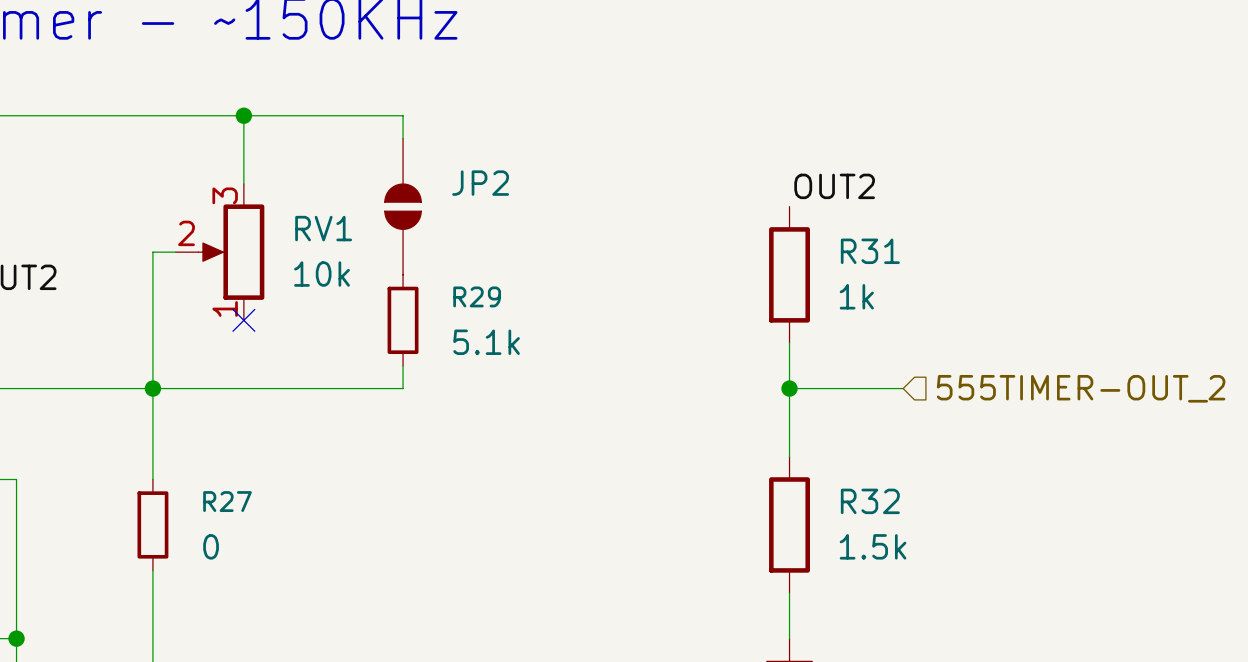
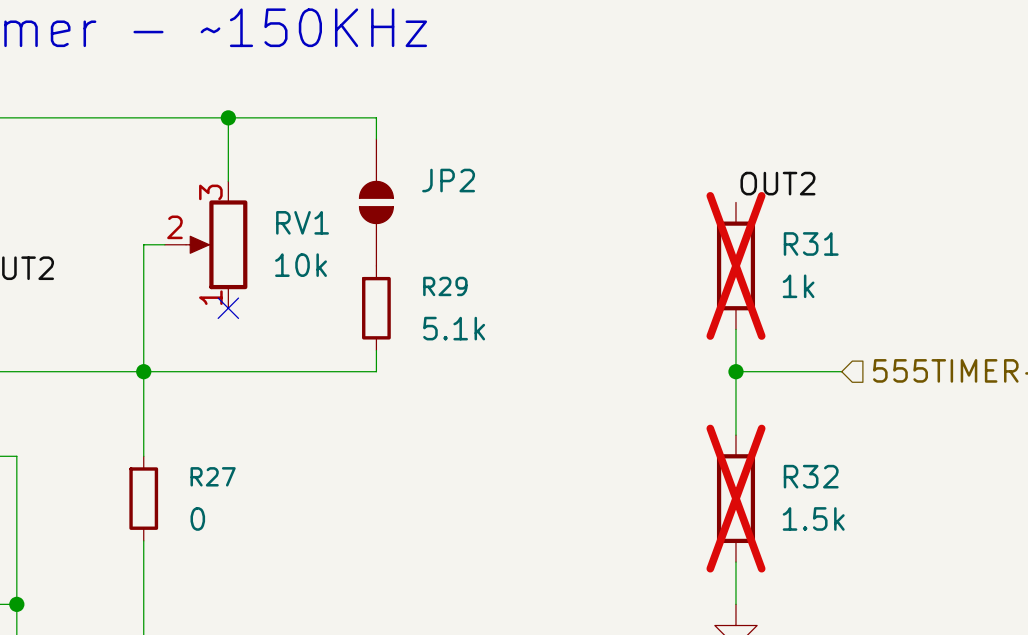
R31 do-not-place cross: none -> (735, 265)
R32 do-not-place cross: none -> (735, 498)

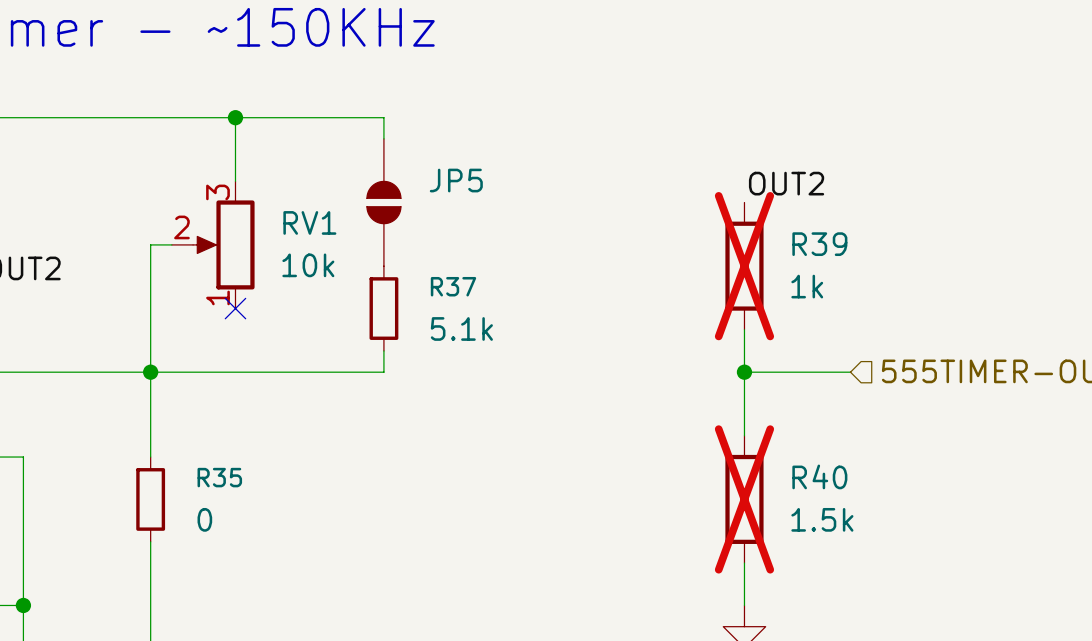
JP2 name: JP2 (448, 180) -> JP5 (456, 180)
R31 name: R31 (811, 243) -> R39 (819, 244)
R29 name: R29 (445, 286) -> R37 (453, 286)
R27 name: R27 (213, 476) -> R35 (219, 477)
R32 name: R32 (811, 476) -> R40 (819, 476)

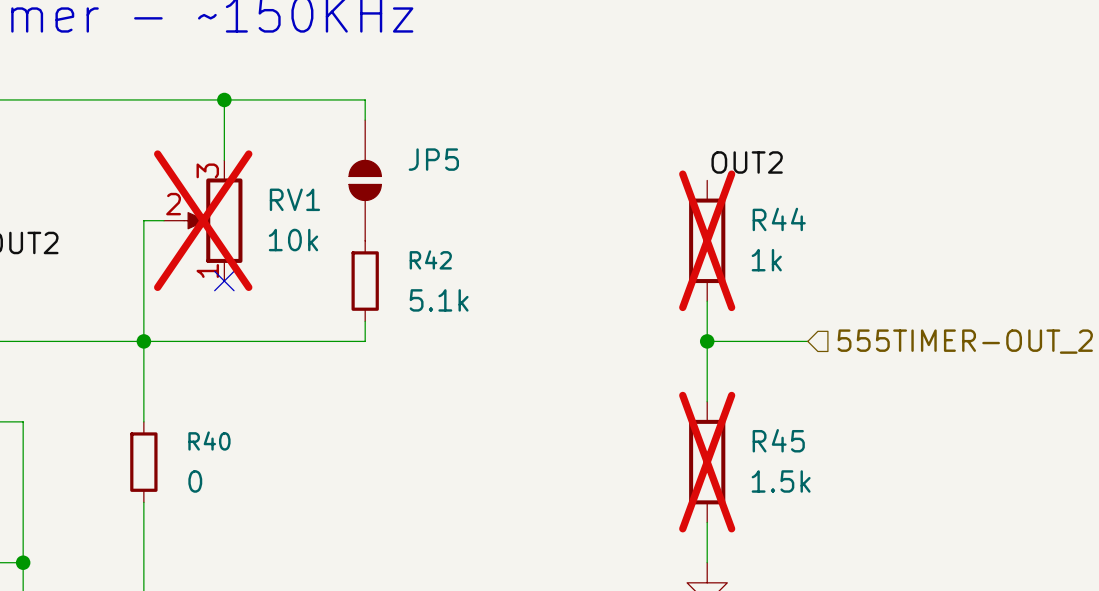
RV1 do-not-place cross: none -> (203, 220)
R39 name: R39 (819, 244) -> R44 (779, 219)
R37 name: R37 (453, 286) -> R42 (430, 259)
R40 name: R40 (819, 476) -> R45 (778, 440)
R35 name: R35 (219, 477) -> R40 (209, 441)

